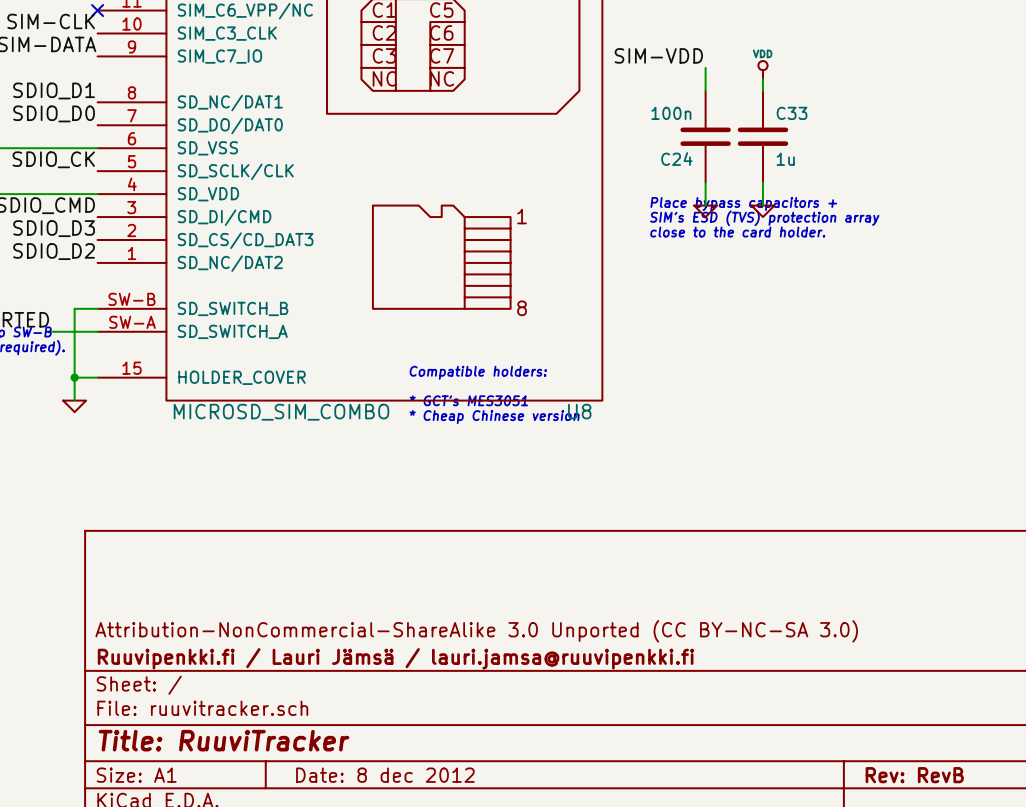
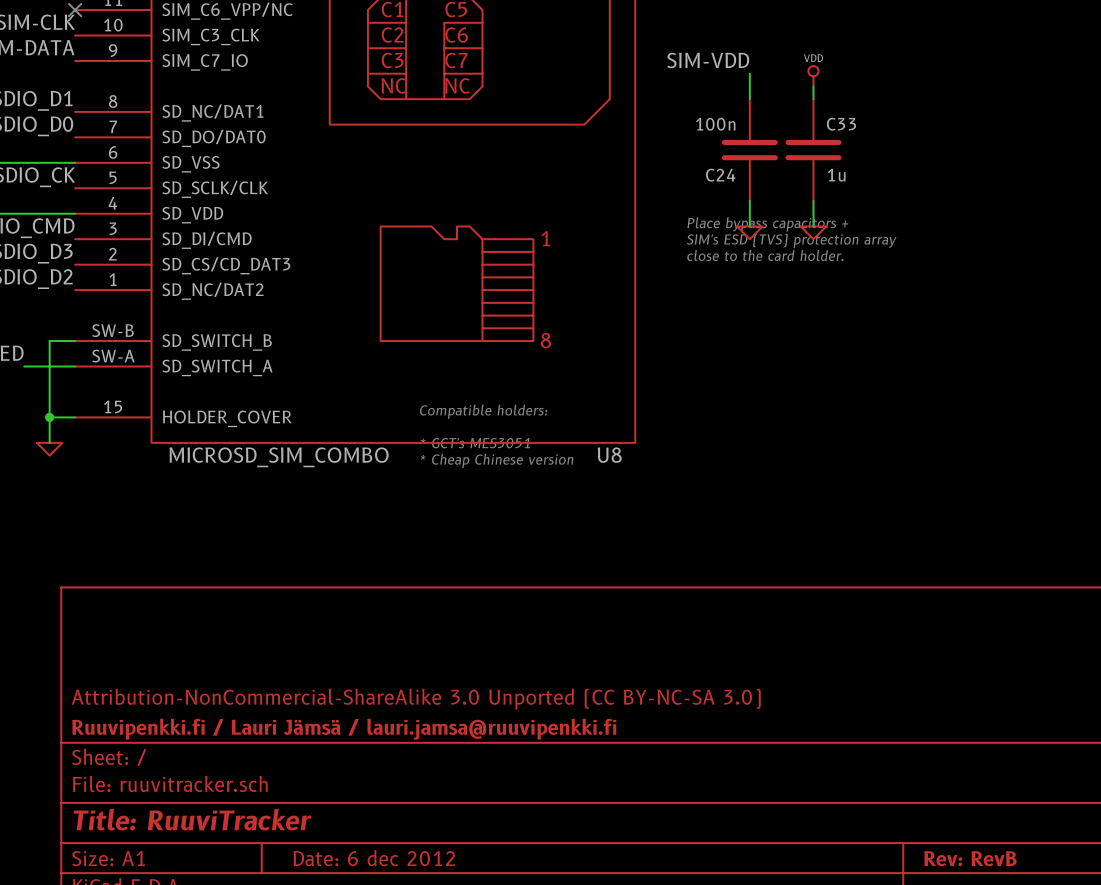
title block: Date: 8 dec 2012 (385, 775) -> Date: 6 dec 2012 (374, 858)

